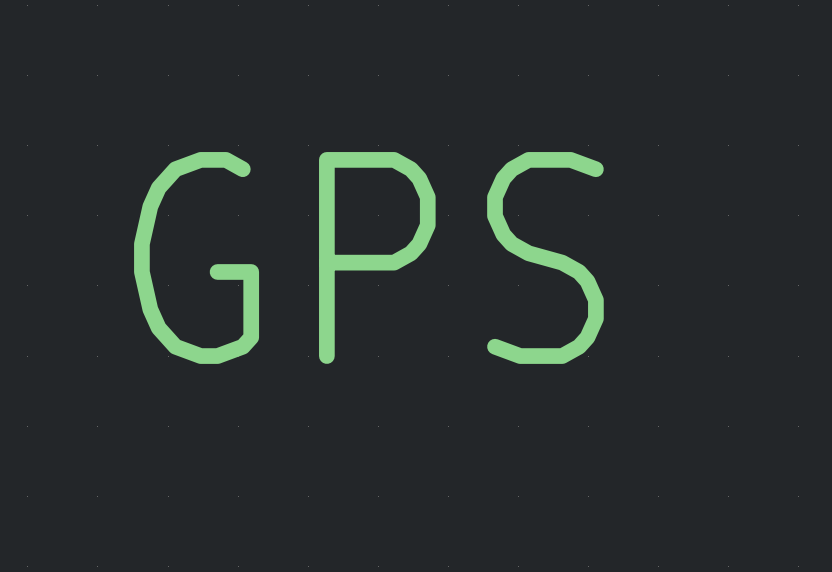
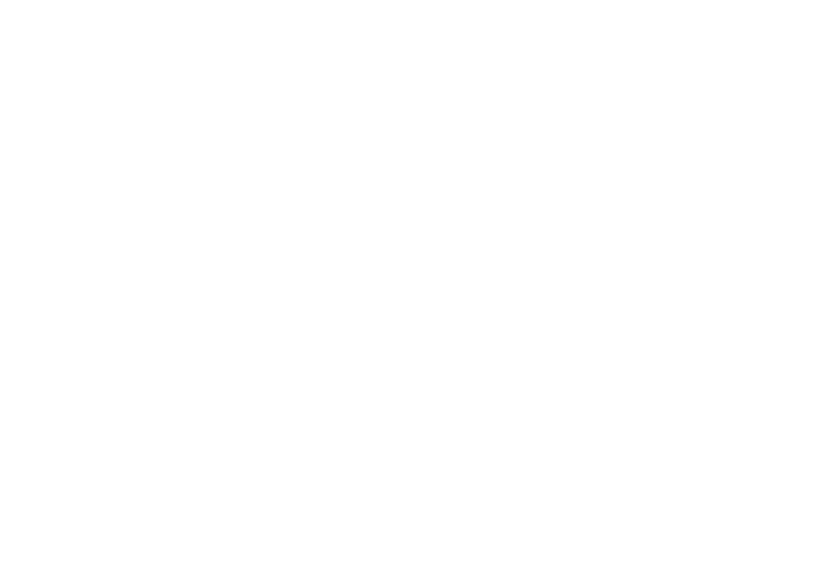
text: GPS (368, 257) -> none

